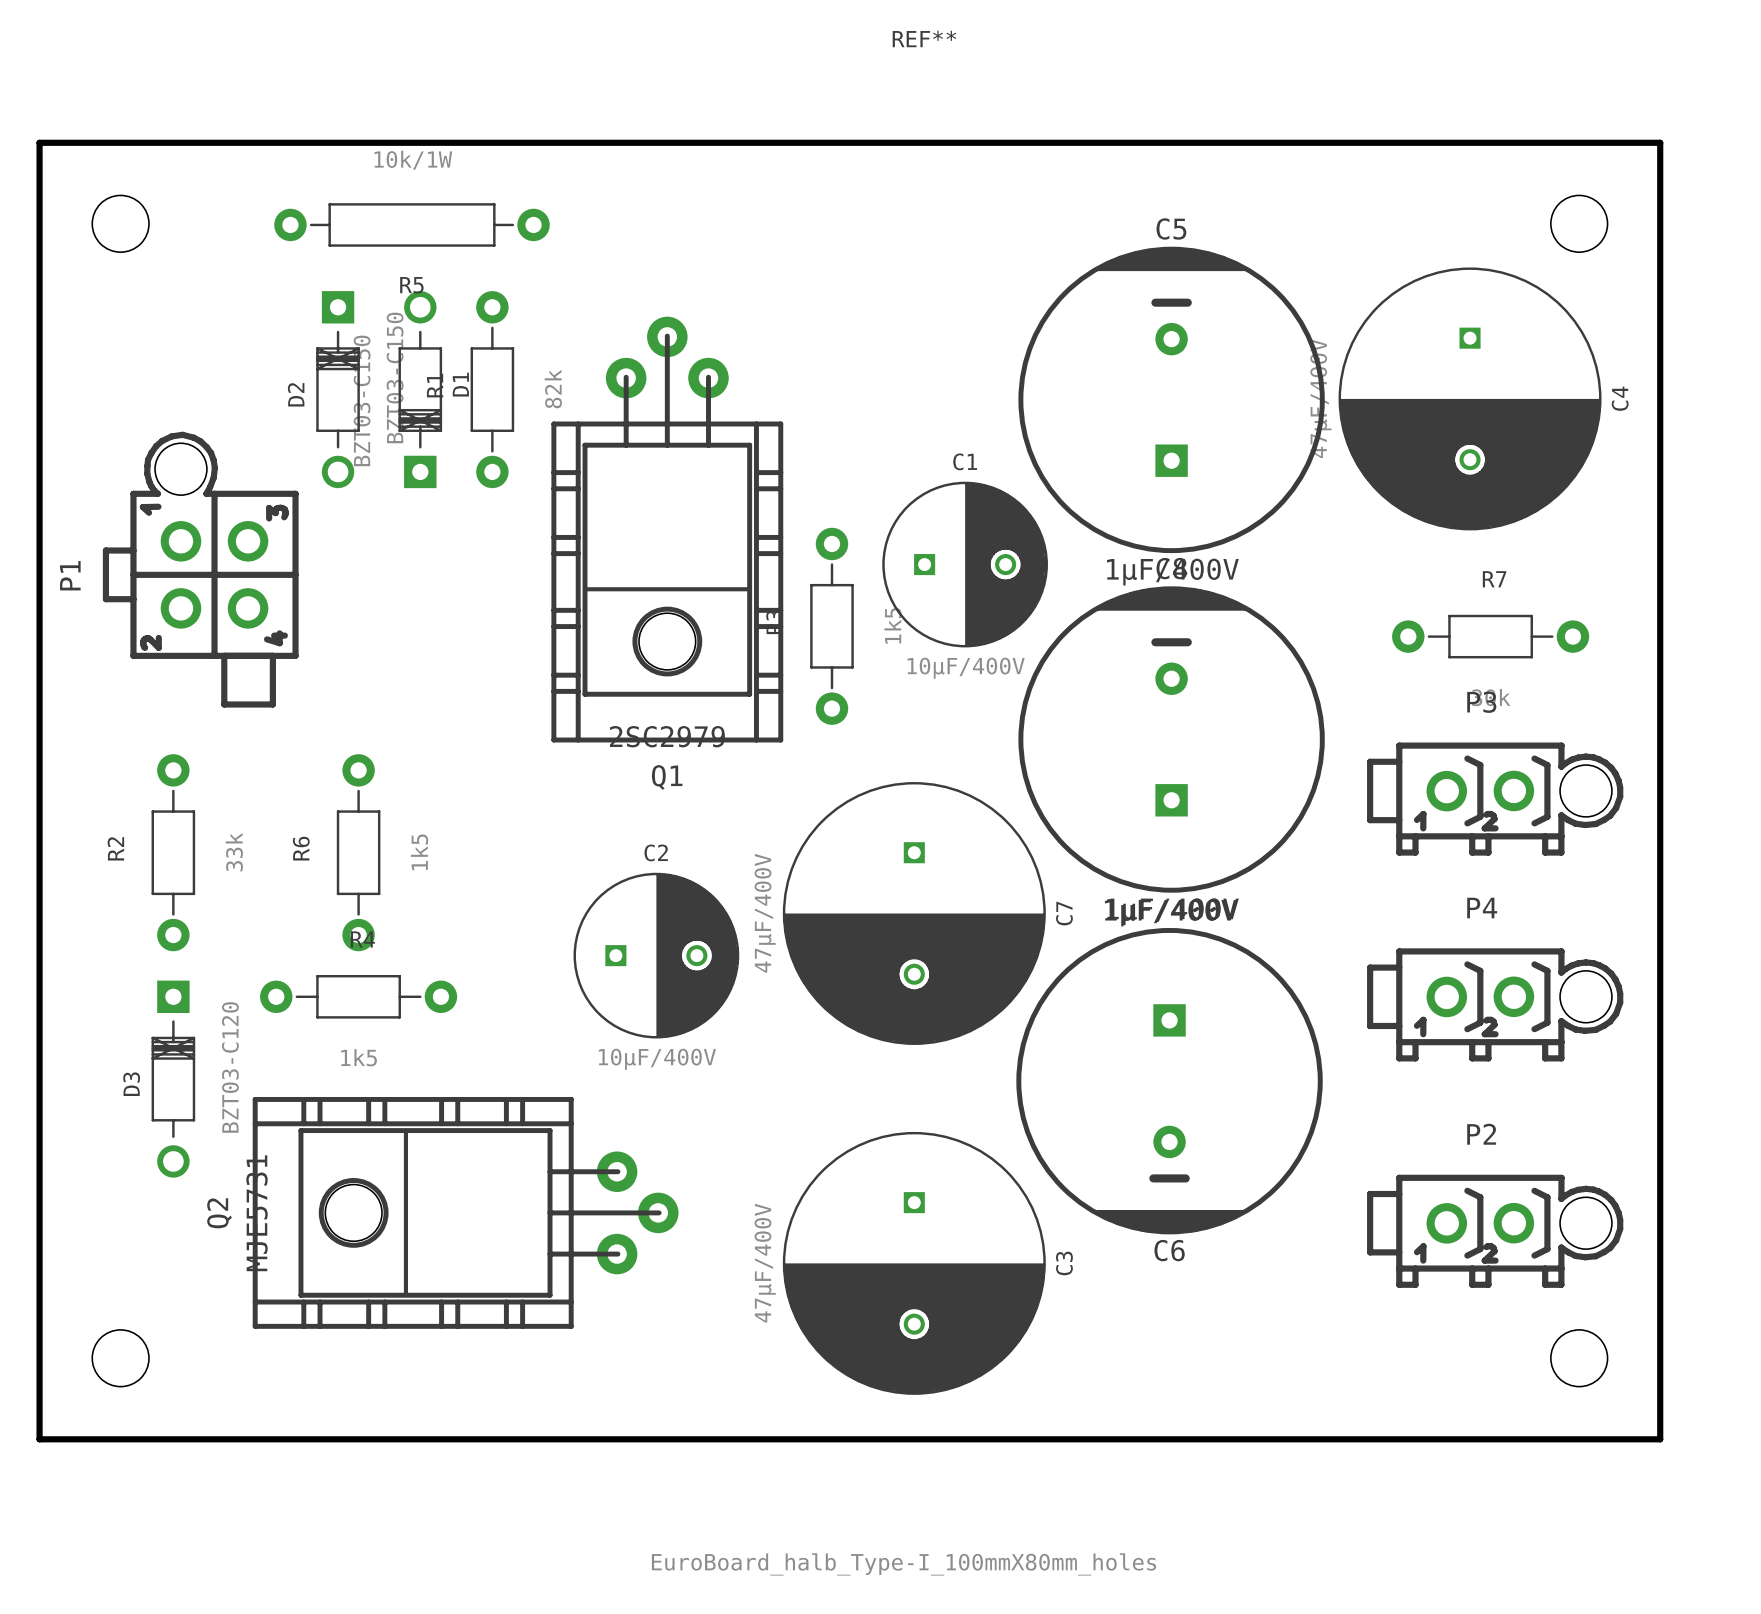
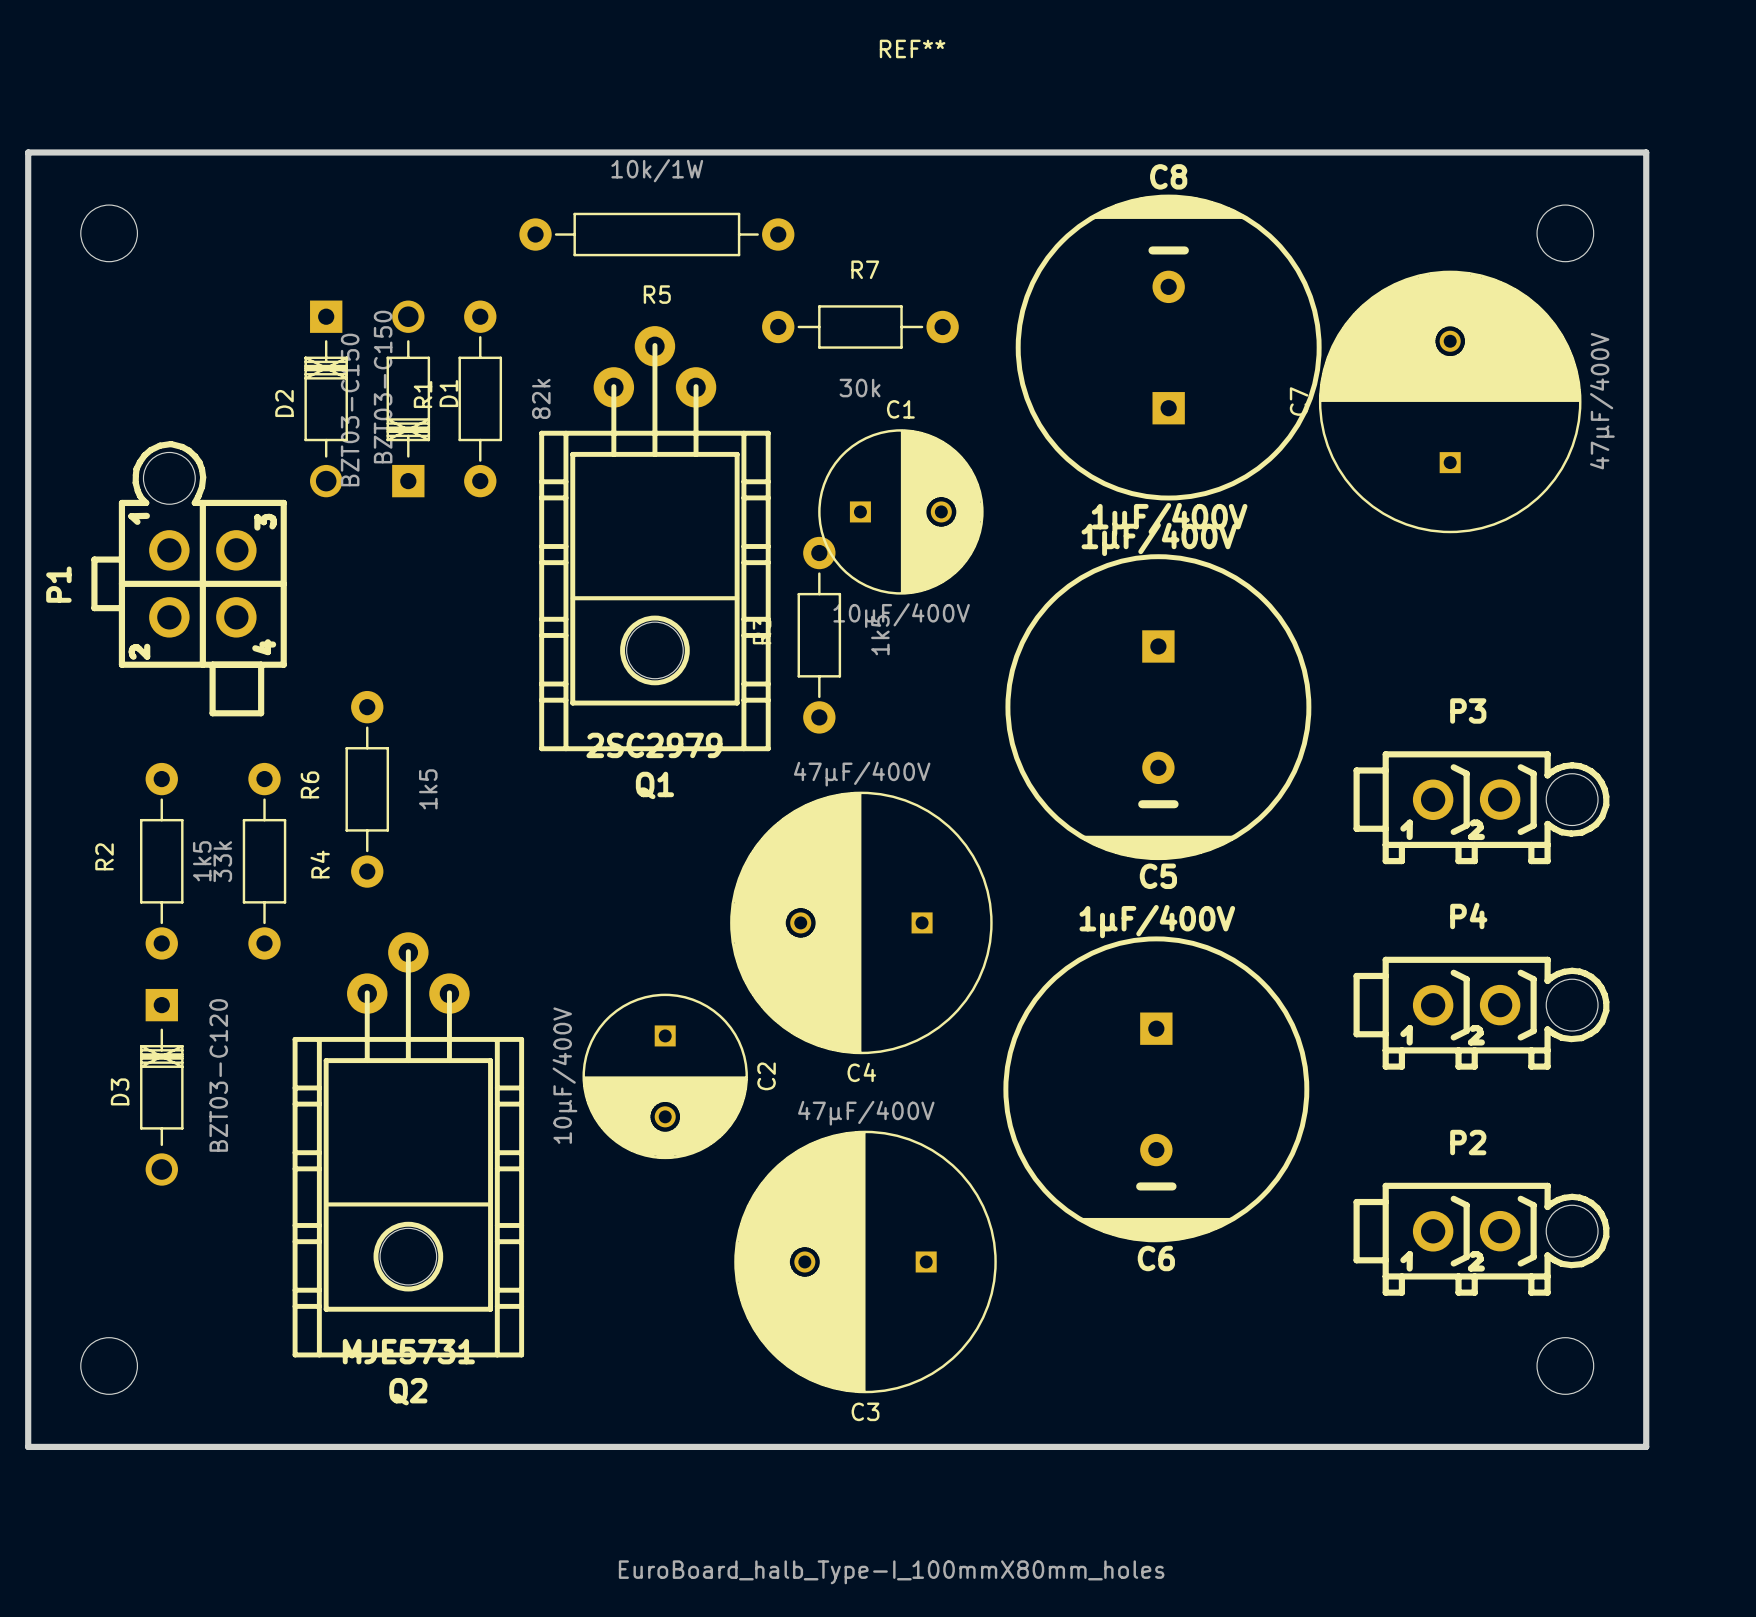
R5 position: (411, 224) -> (656, 234)
C4 rotation: 0° (1470, 398) -> 90° clockwise (861, 922)
C4 position: (1470, 398) -> (861, 922)
C5 rotation: 0° (1171, 399) -> 180° (1158, 707)
C5 position: (1171, 399) -> (1158, 707)
C1 position: (965, 564) -> (900, 511)
R7 position: (1490, 636) -> (860, 326)
C8 position: (1171, 739) -> (1168, 347)
R6 position: (358, 852) -> (367, 789)
C7 rotation: 0° (914, 913) -> 180° (1450, 401)
C7 position: (914, 913) -> (1450, 401)
C2 rotation: 0° (656, 955) -> 90° clockwise (665, 1076)
C2 position: (656, 955) -> (665, 1076)
R4 rotation: 0° (358, 996) -> 90° clockwise (264, 861)
R4 position: (358, 996) -> (264, 861)
Q2 rotation: 0° (465, 1212) -> 90° counterclockwise (408, 1144)
C3 rotation: 0° (914, 1263) -> 90° clockwise (865, 1261)

